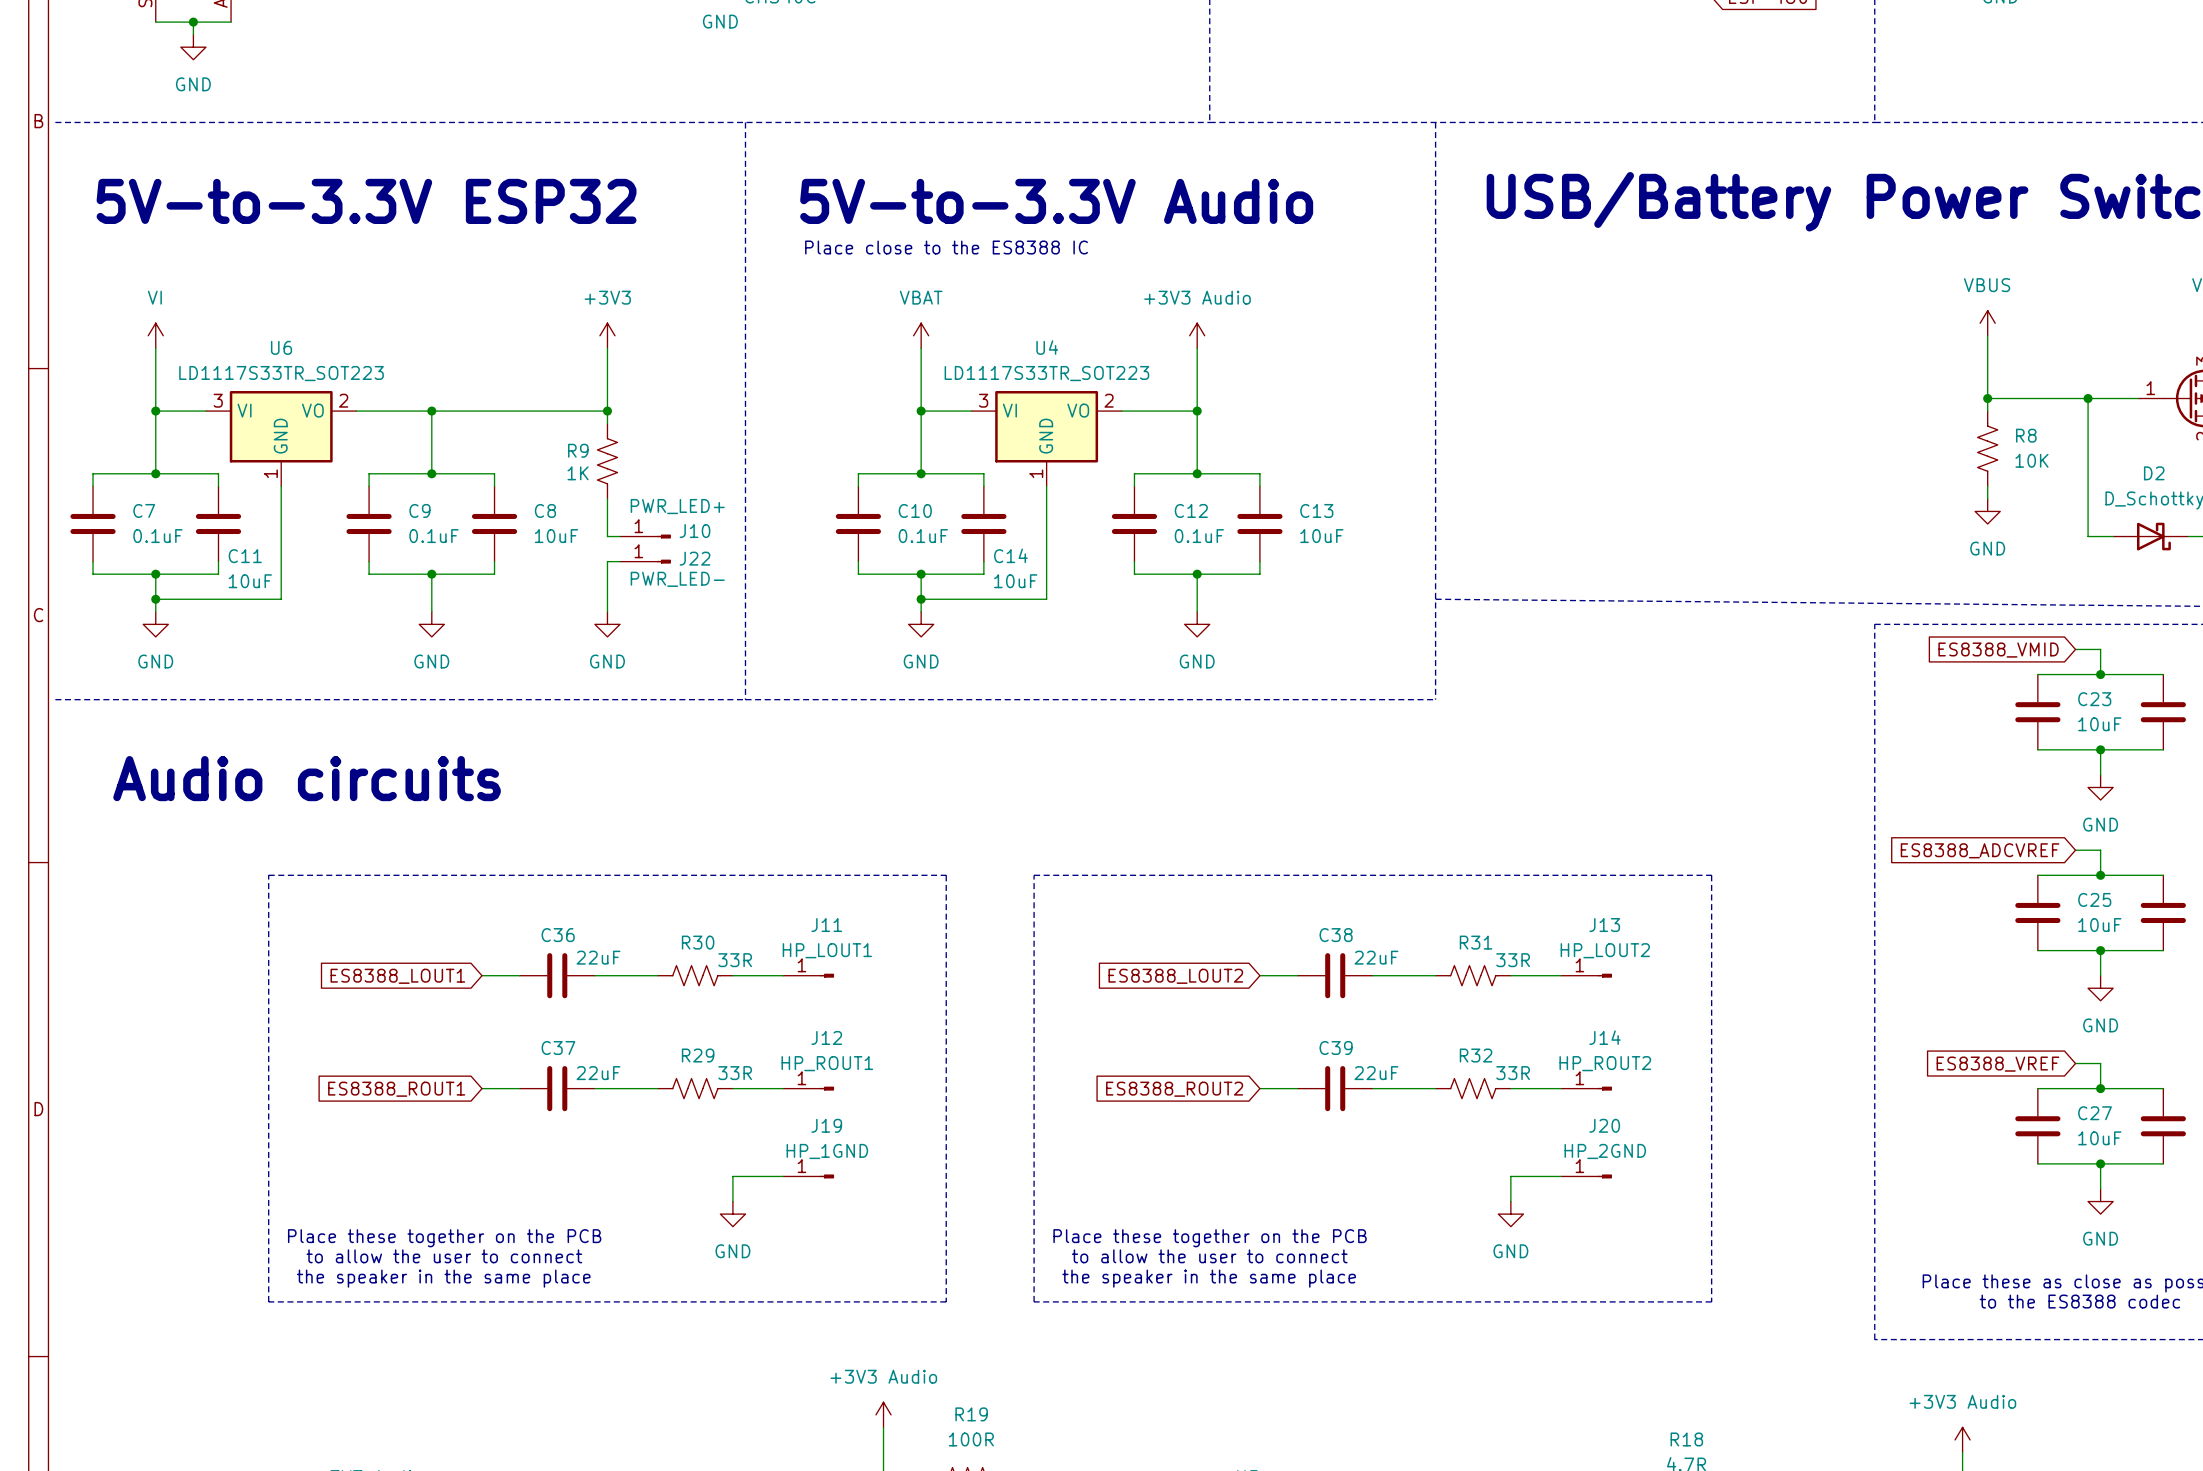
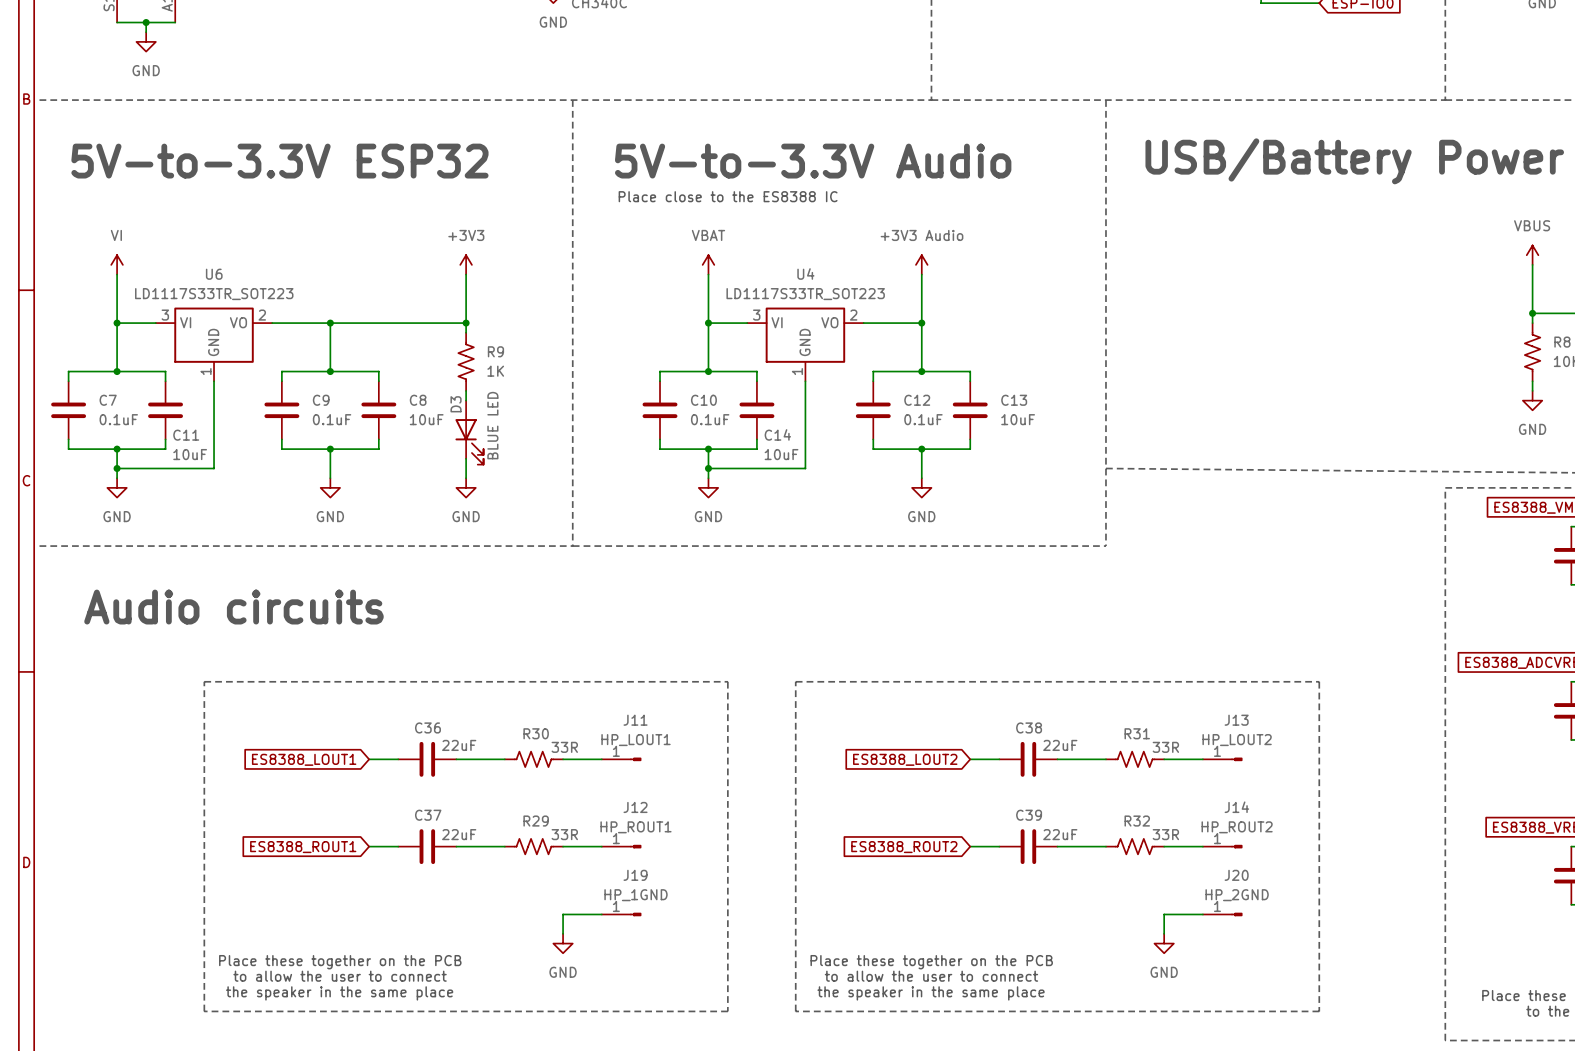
R9 name position: R9 (578, 450) -> R9 (495, 351)
R9 value position: 1K (578, 473) -> 1K (495, 371)
J10: PWR_LED+ (645, 536) -> none
D3: none -> BLUE LED (469, 432)
J22: PWR_LED- (645, 561) -> none

